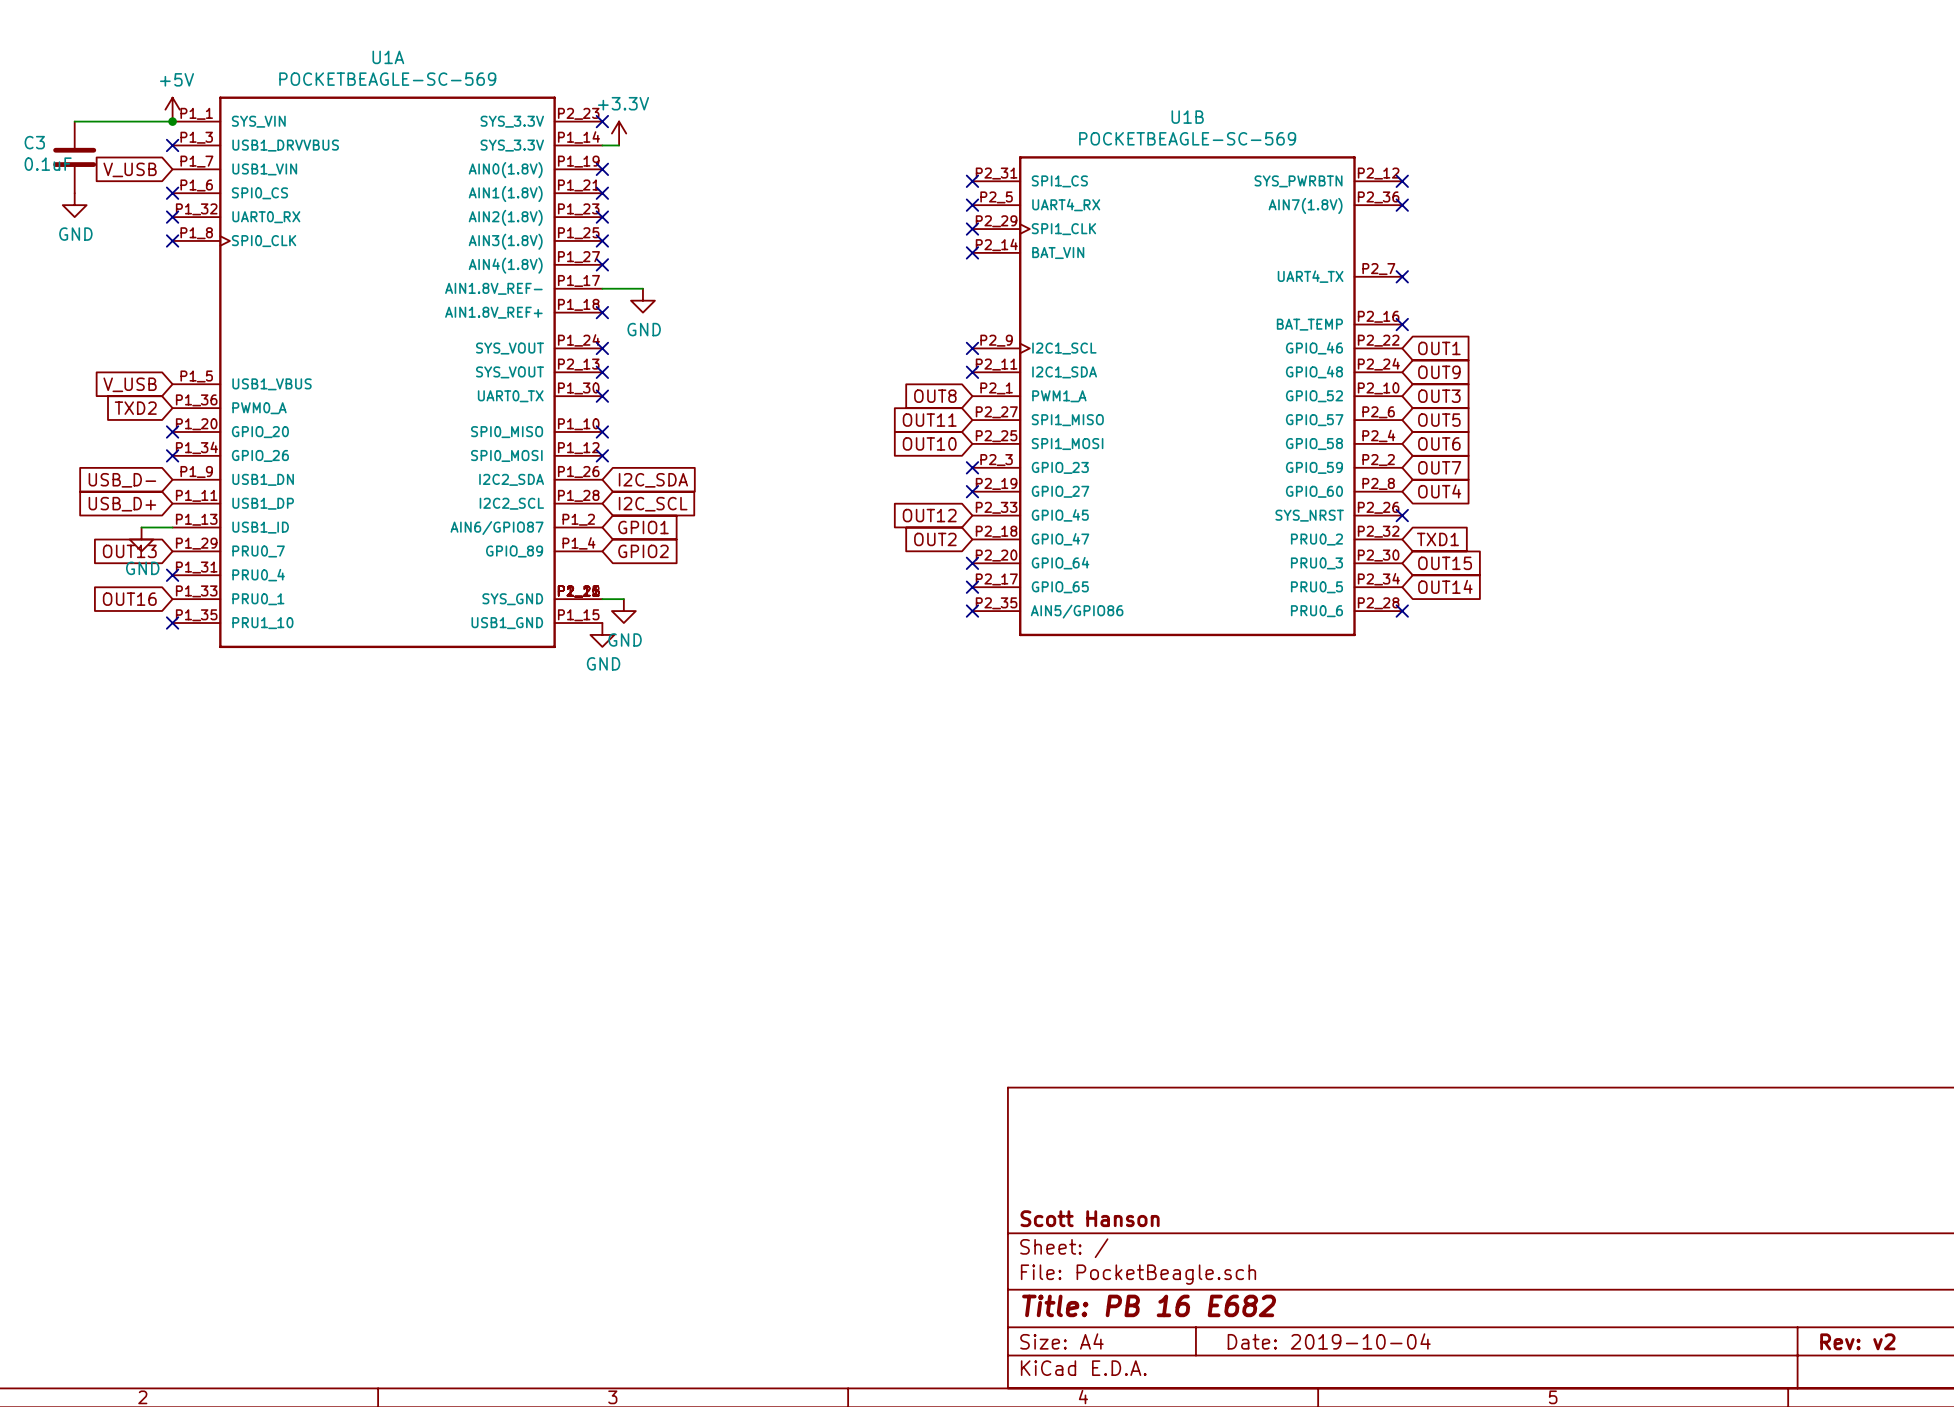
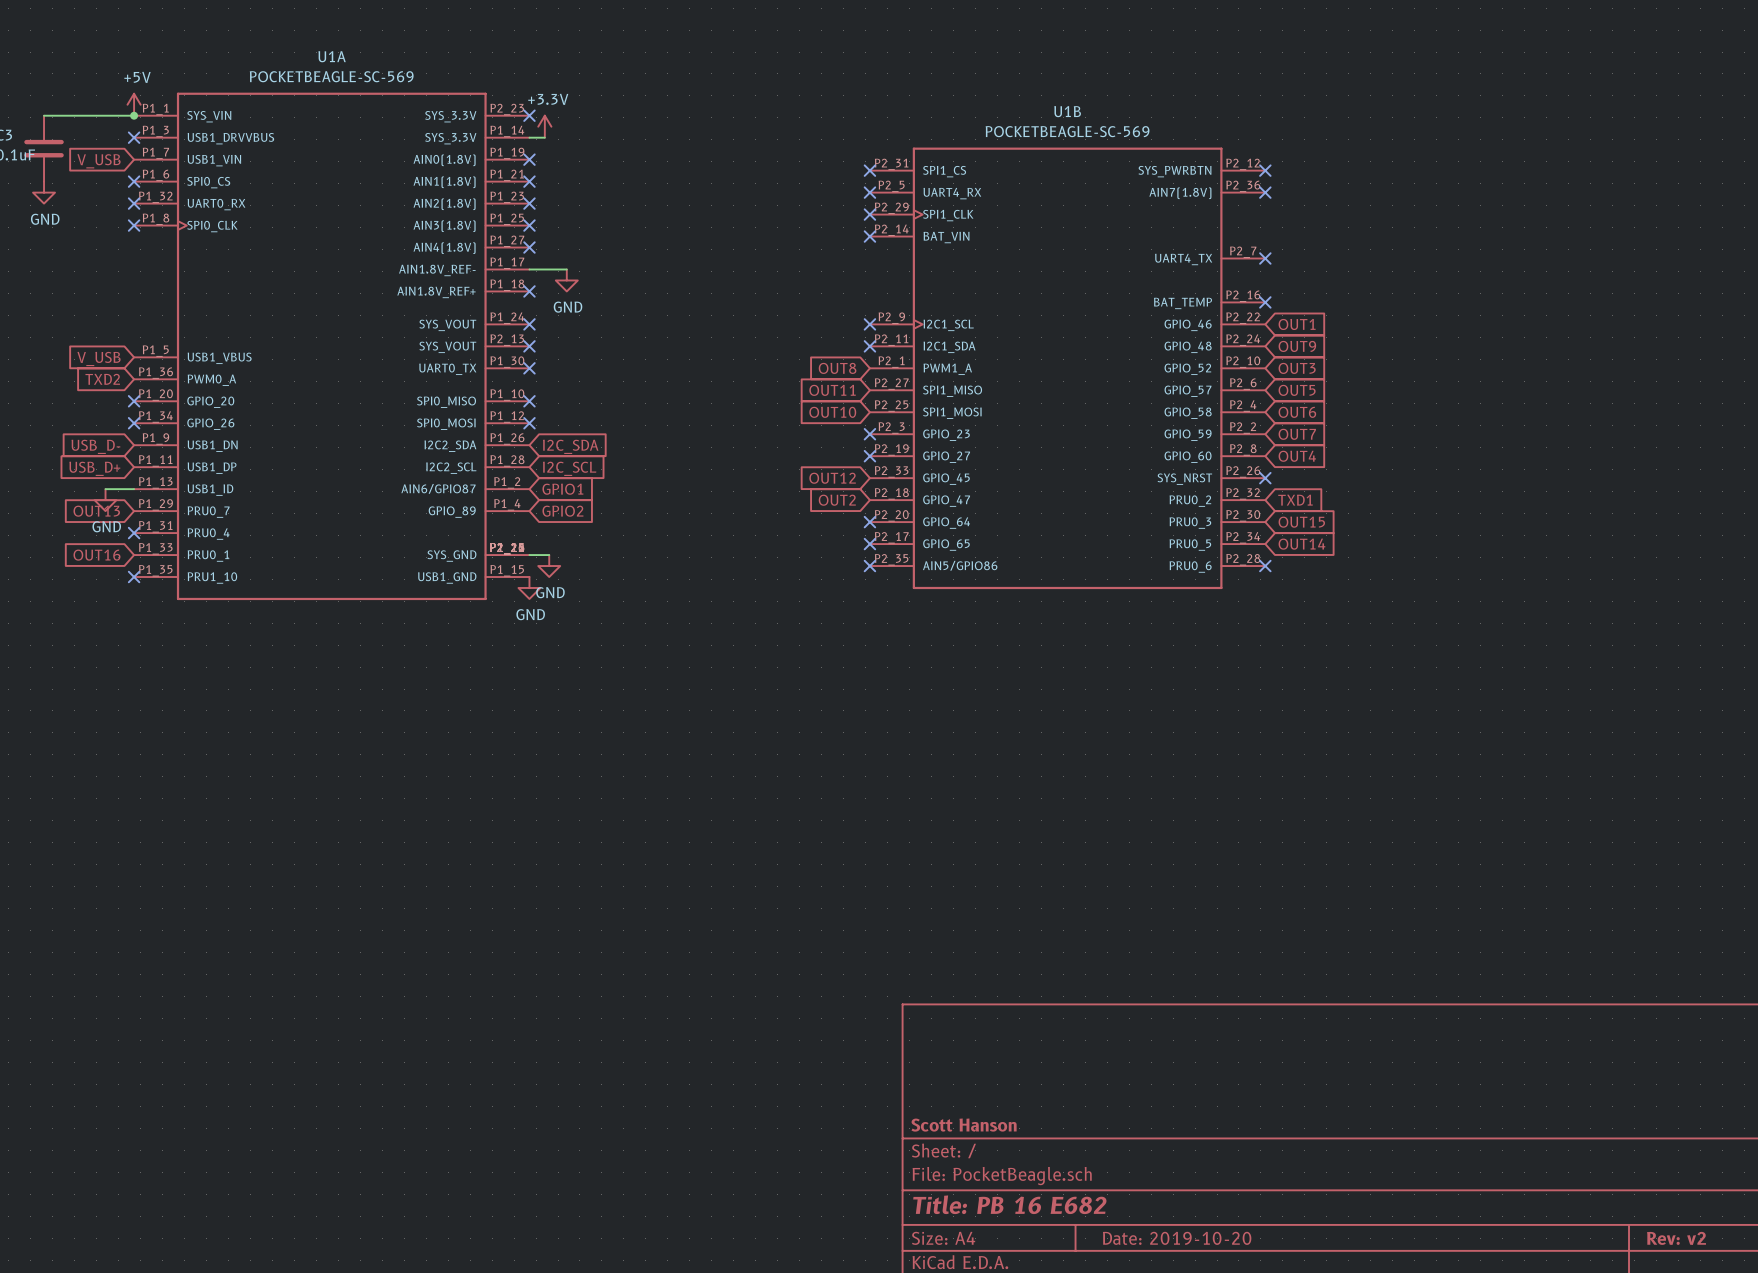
title block: Date: 2019-10-04 (1329, 1341) -> Date: 2019-10-20 (1177, 1238)

